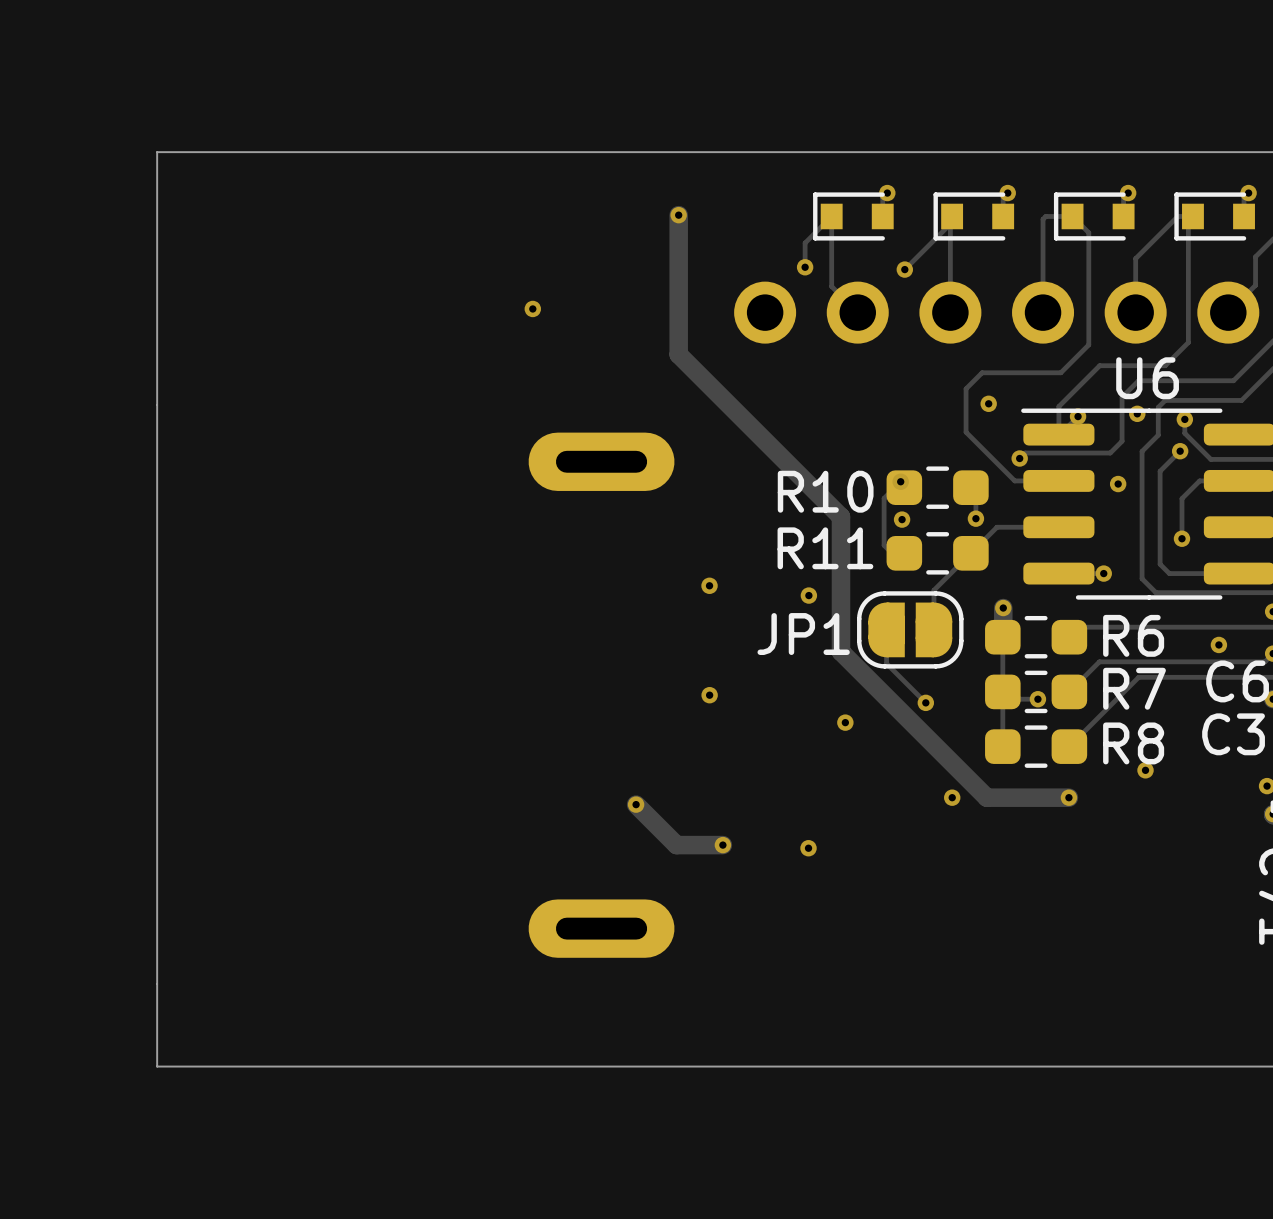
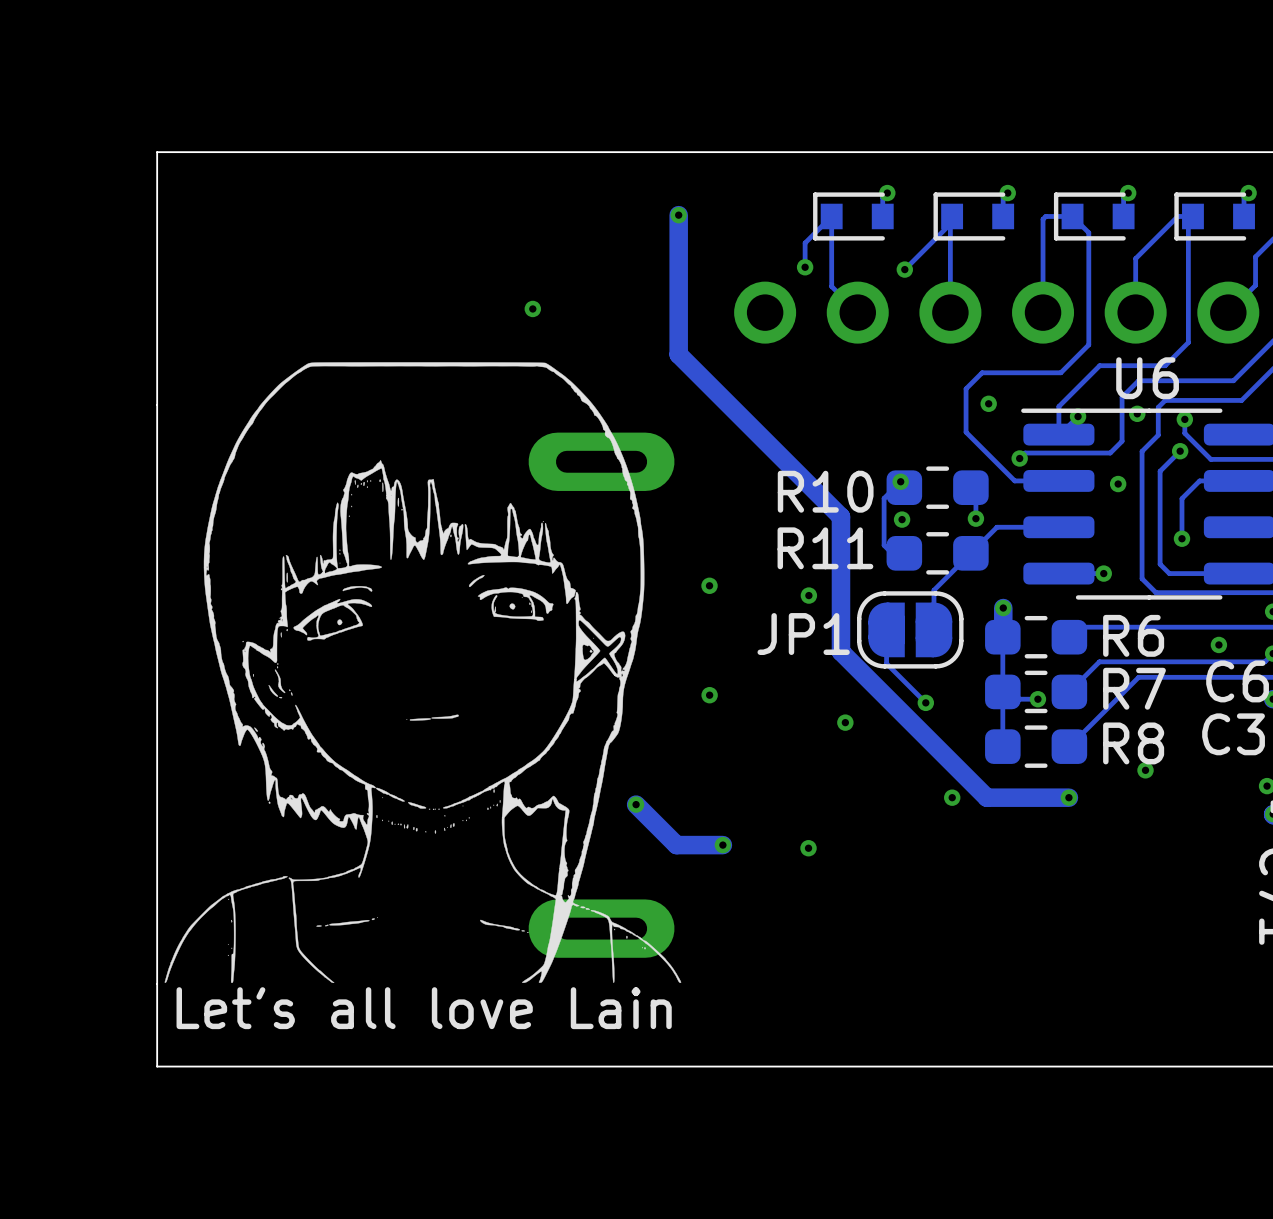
drawing: none -> [164, 362, 682, 983]
text: none -> Let's all love Lain (424, 1008)

